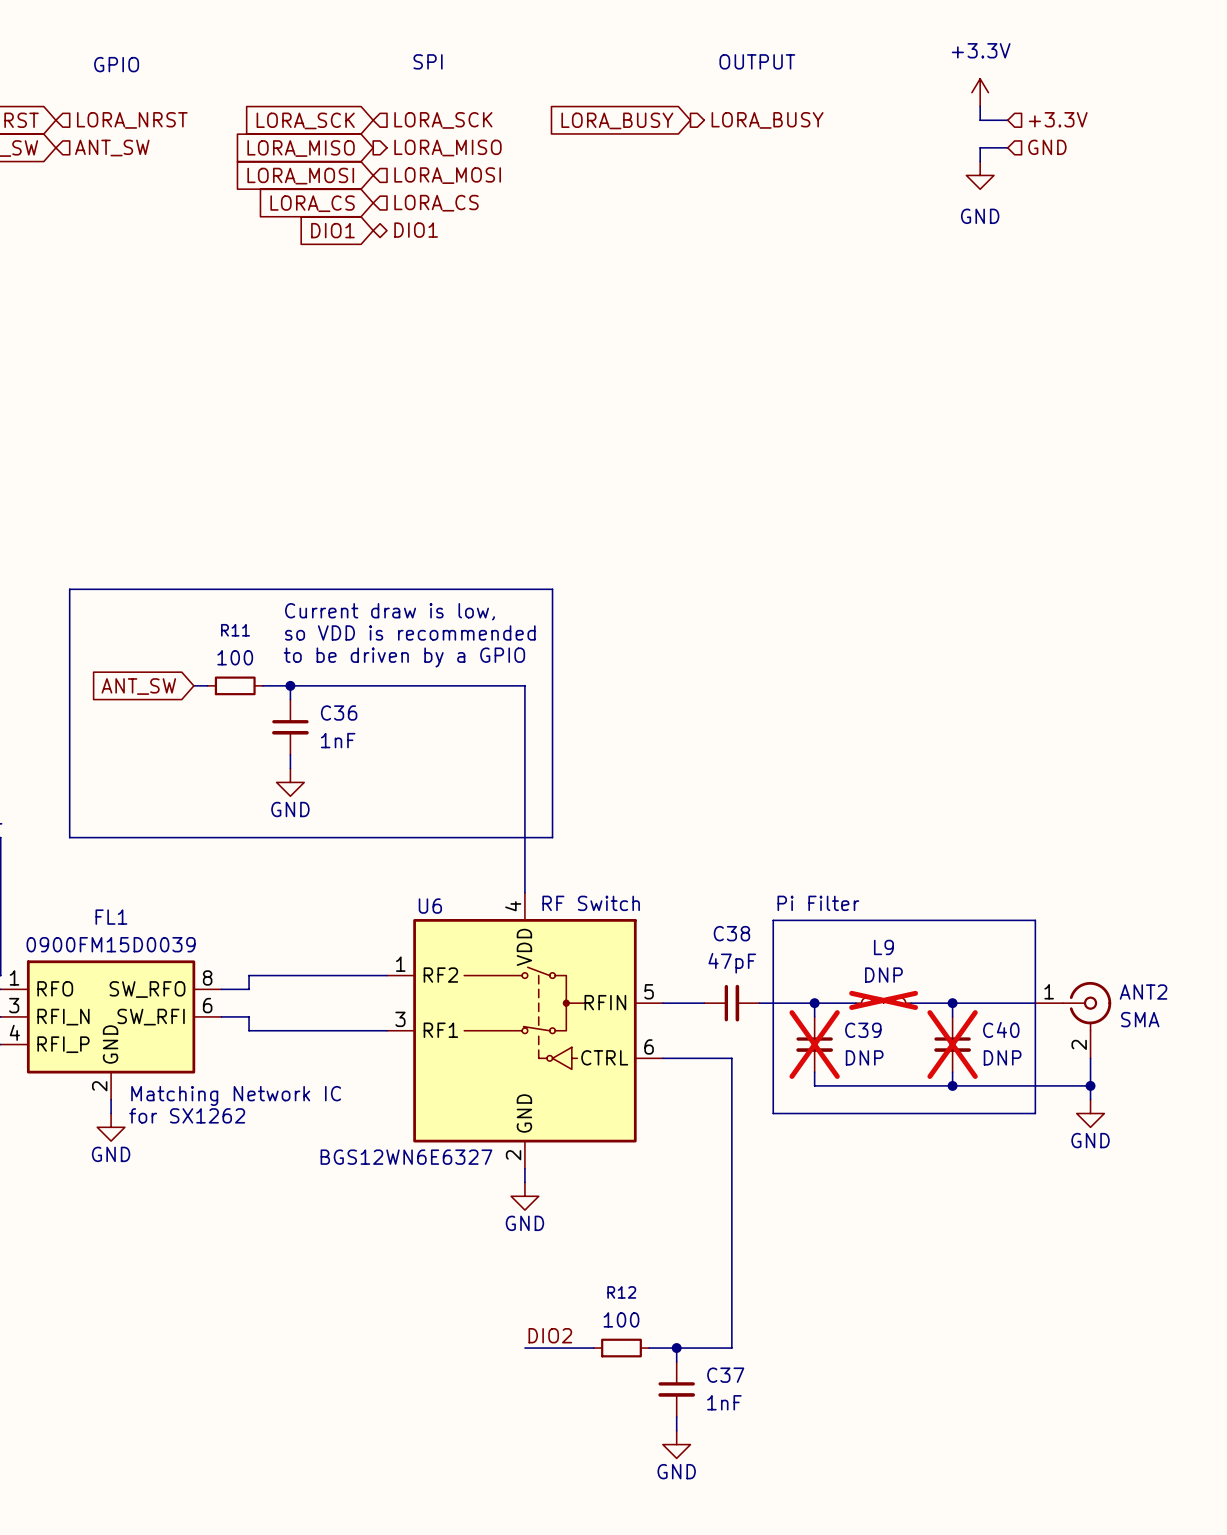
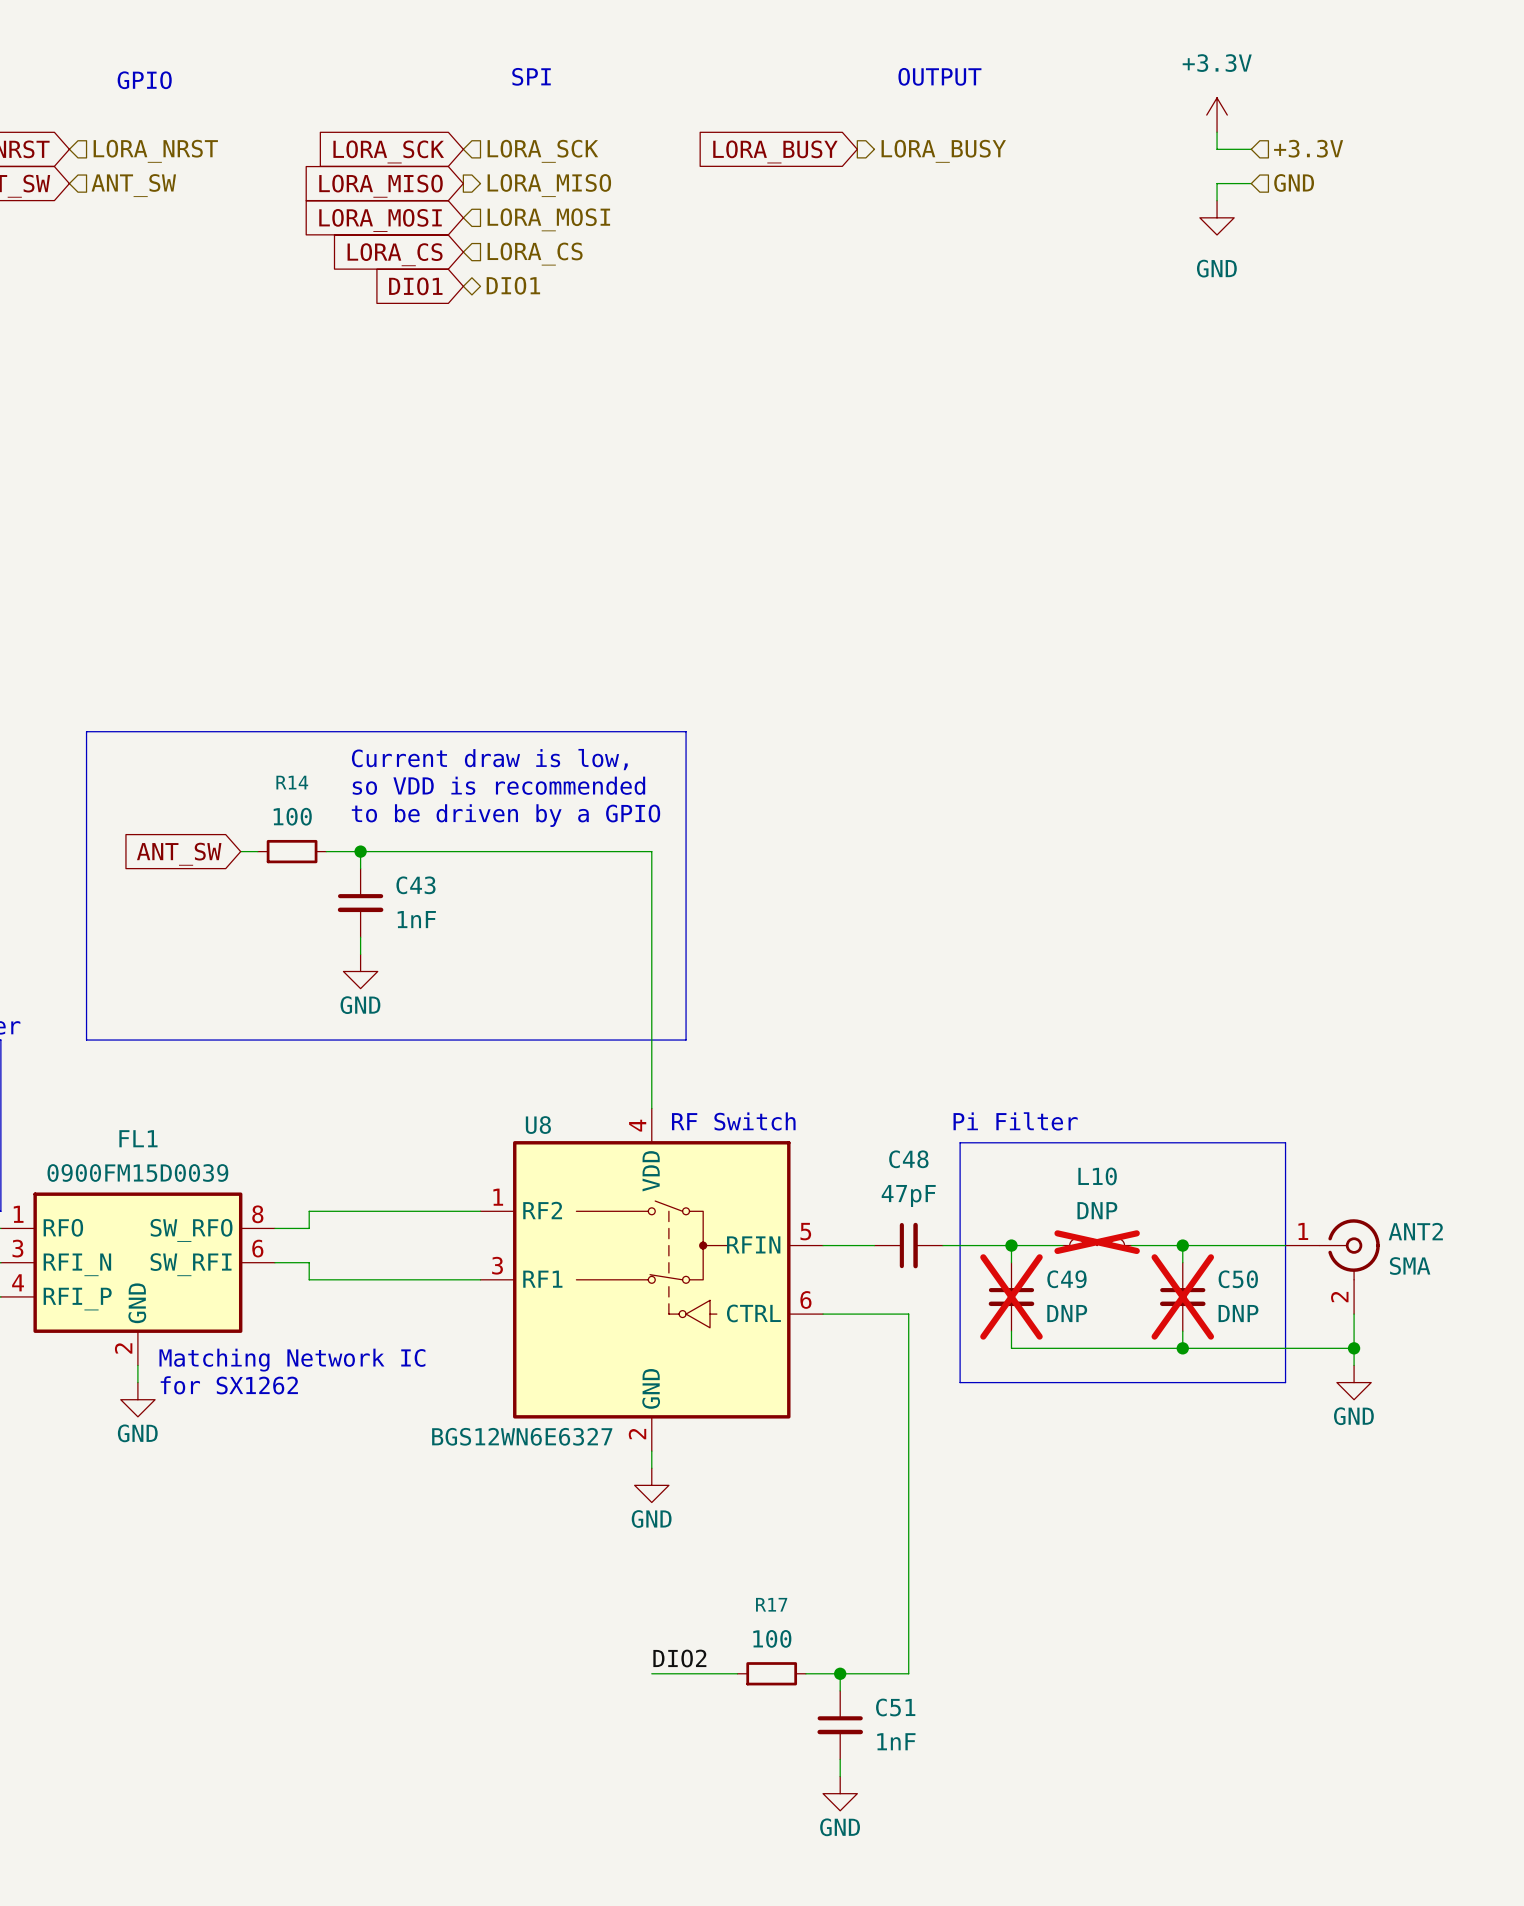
R11 name: R11 (235, 630) -> R14 (292, 782)
C36 name: C36 (339, 713) -> C43 (415, 885)
U6 name: U6 (430, 906) -> U8 (538, 1125)
C38 name: C38 (731, 933) -> C48 (908, 1159)
L9 name: L9 (883, 947) -> L10 (1097, 1176)
C40 name: C40 (1001, 1029) -> C50 (1238, 1279)
C39 name: C39 (863, 1030) -> C49 (1066, 1279)
R12 name: R12 (621, 1292) -> R17 (771, 1604)
C37 name: C37 (725, 1375) -> C51 (895, 1707)

